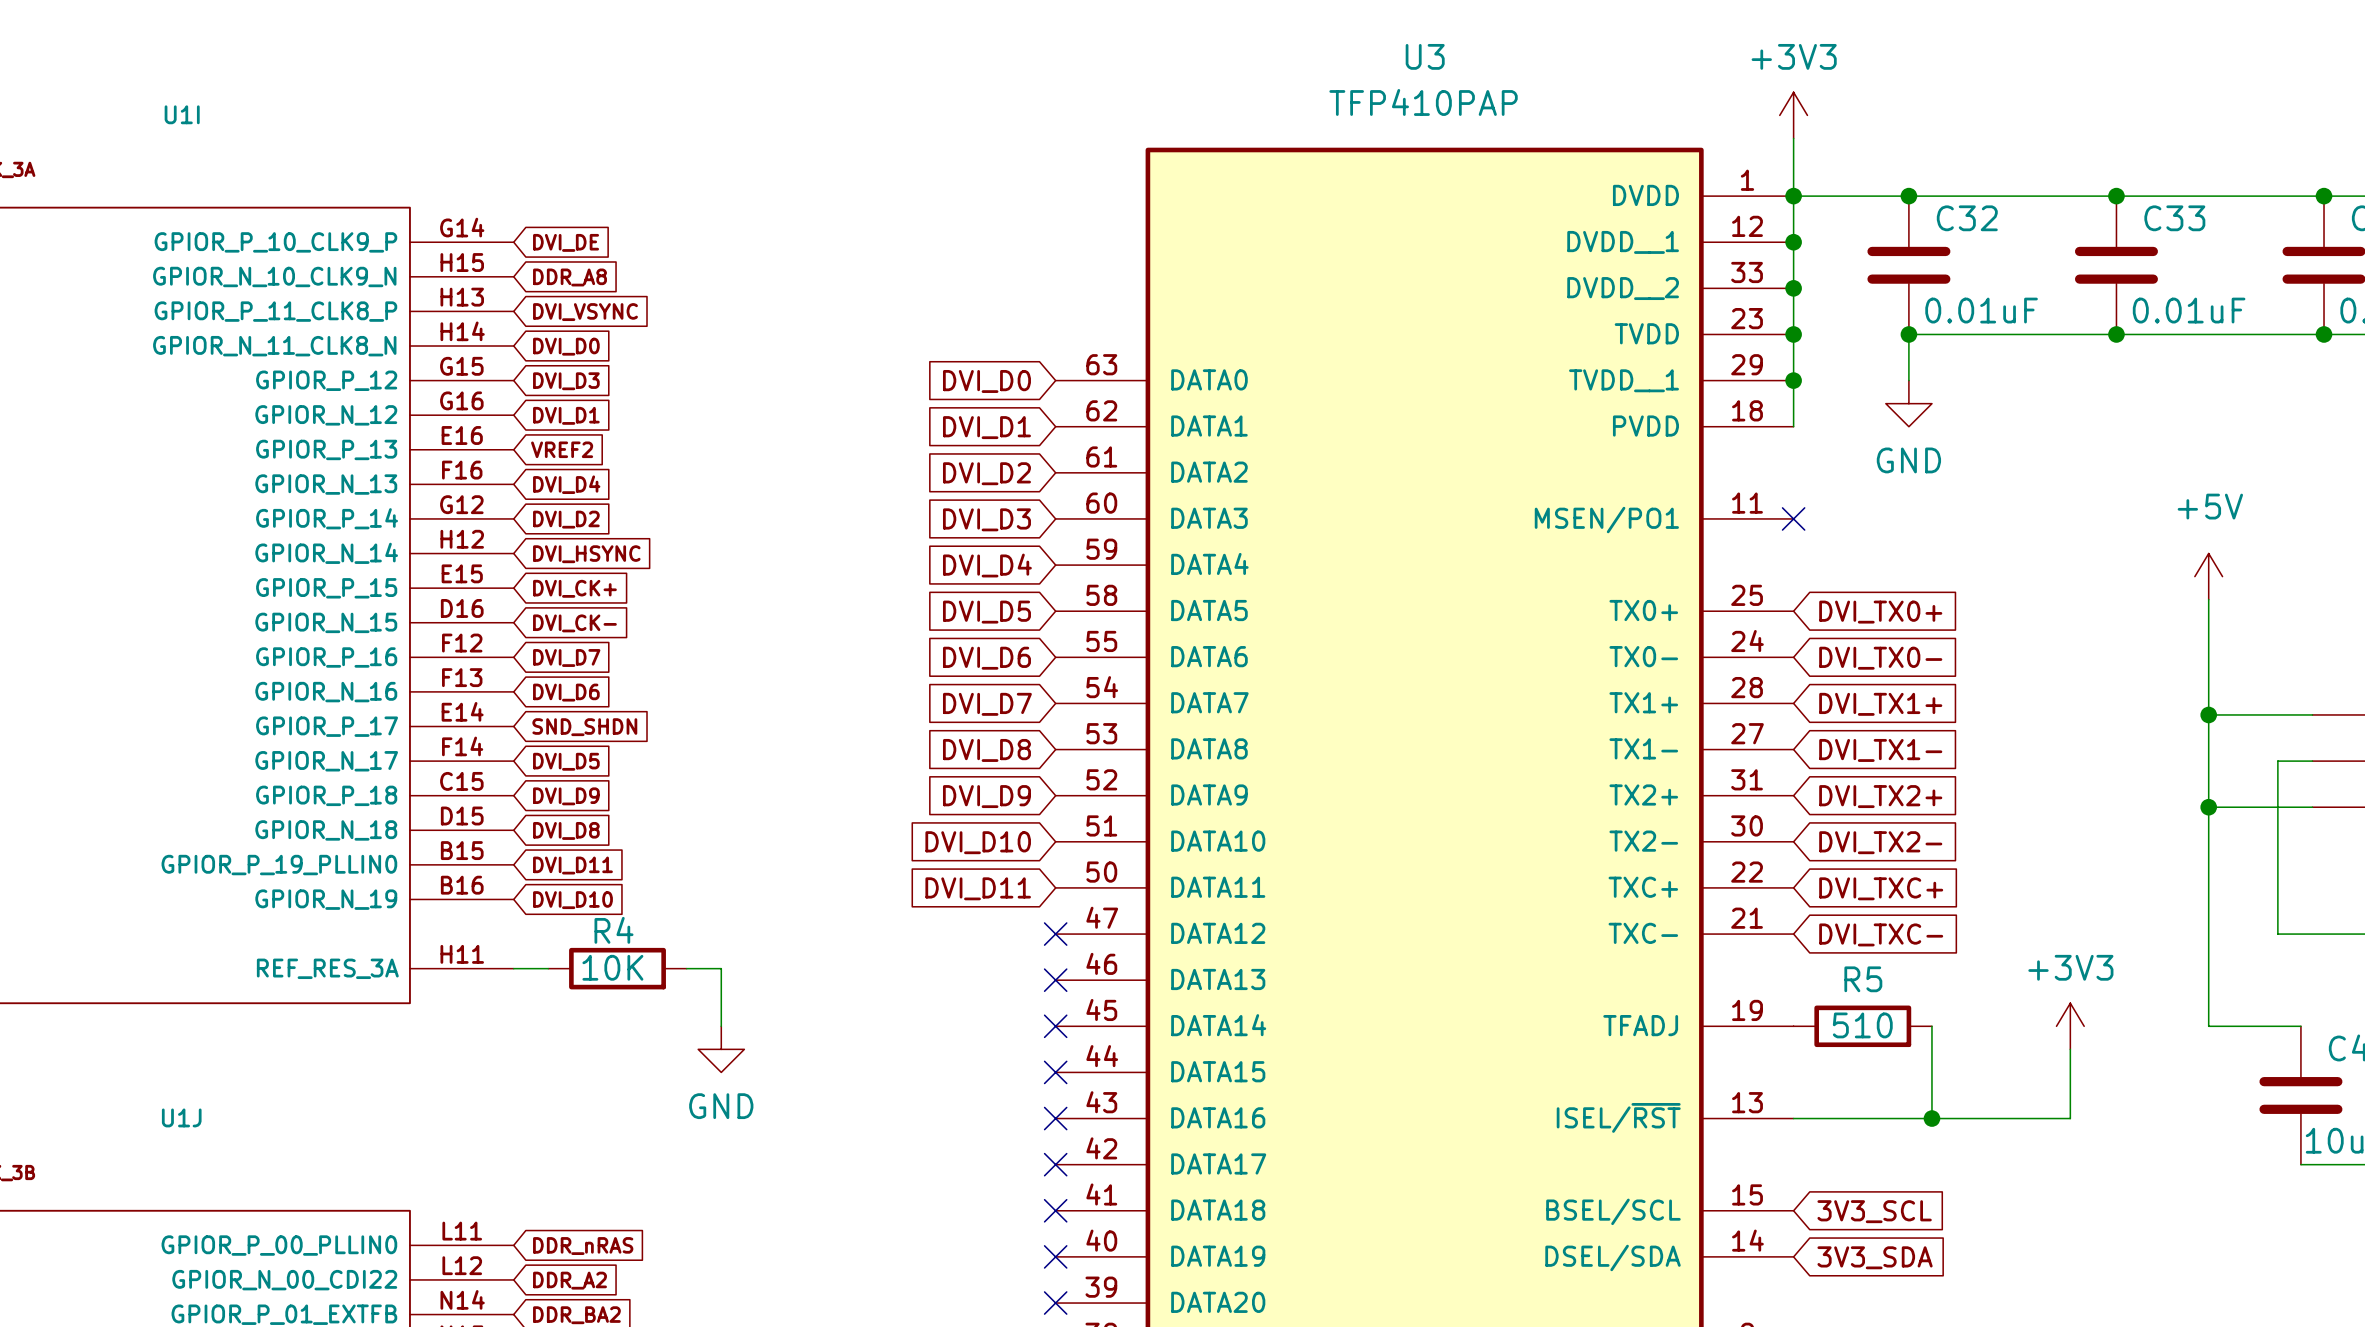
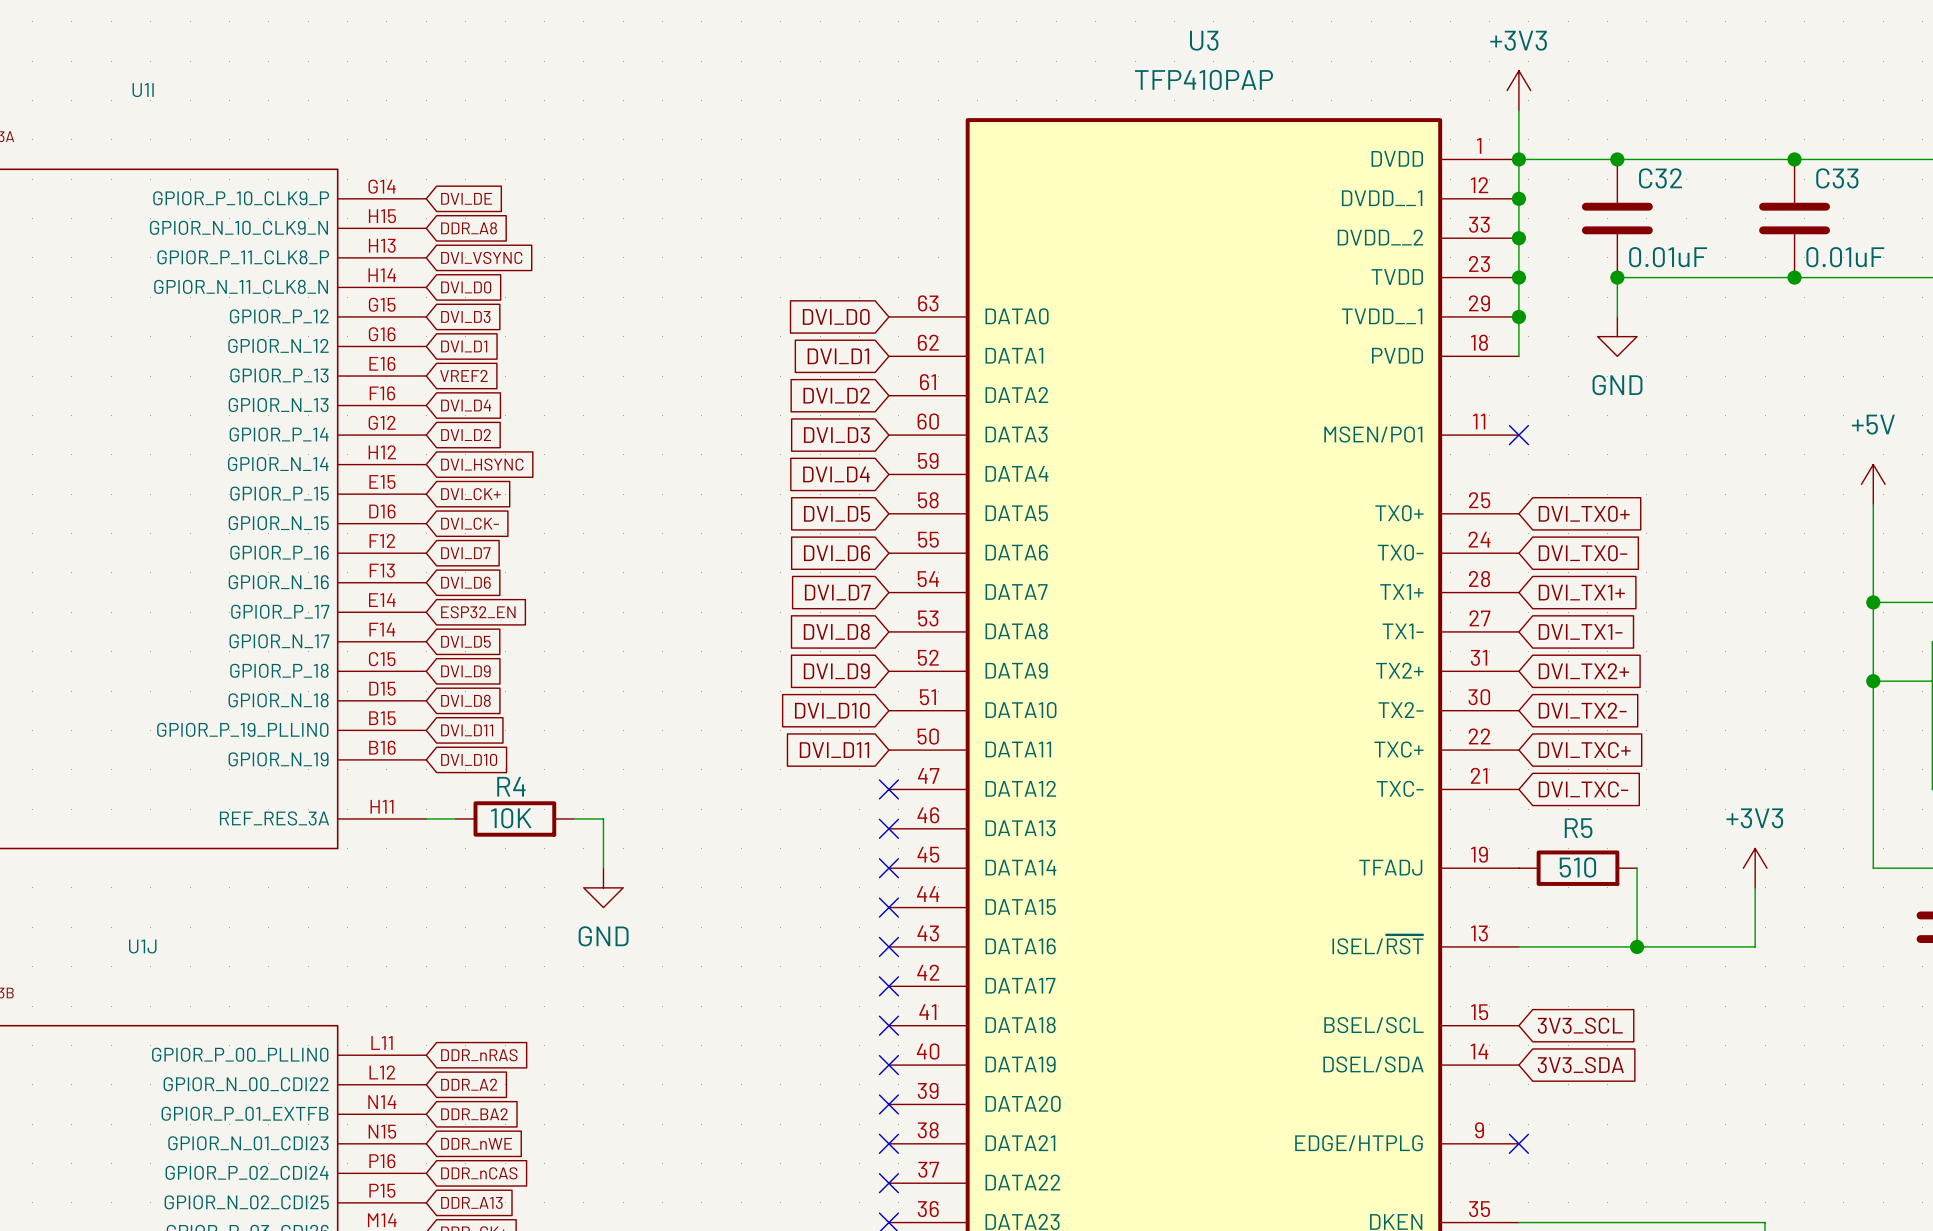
global label: SND_SHDN (584, 727) -> ESP32_EN (478, 612)

